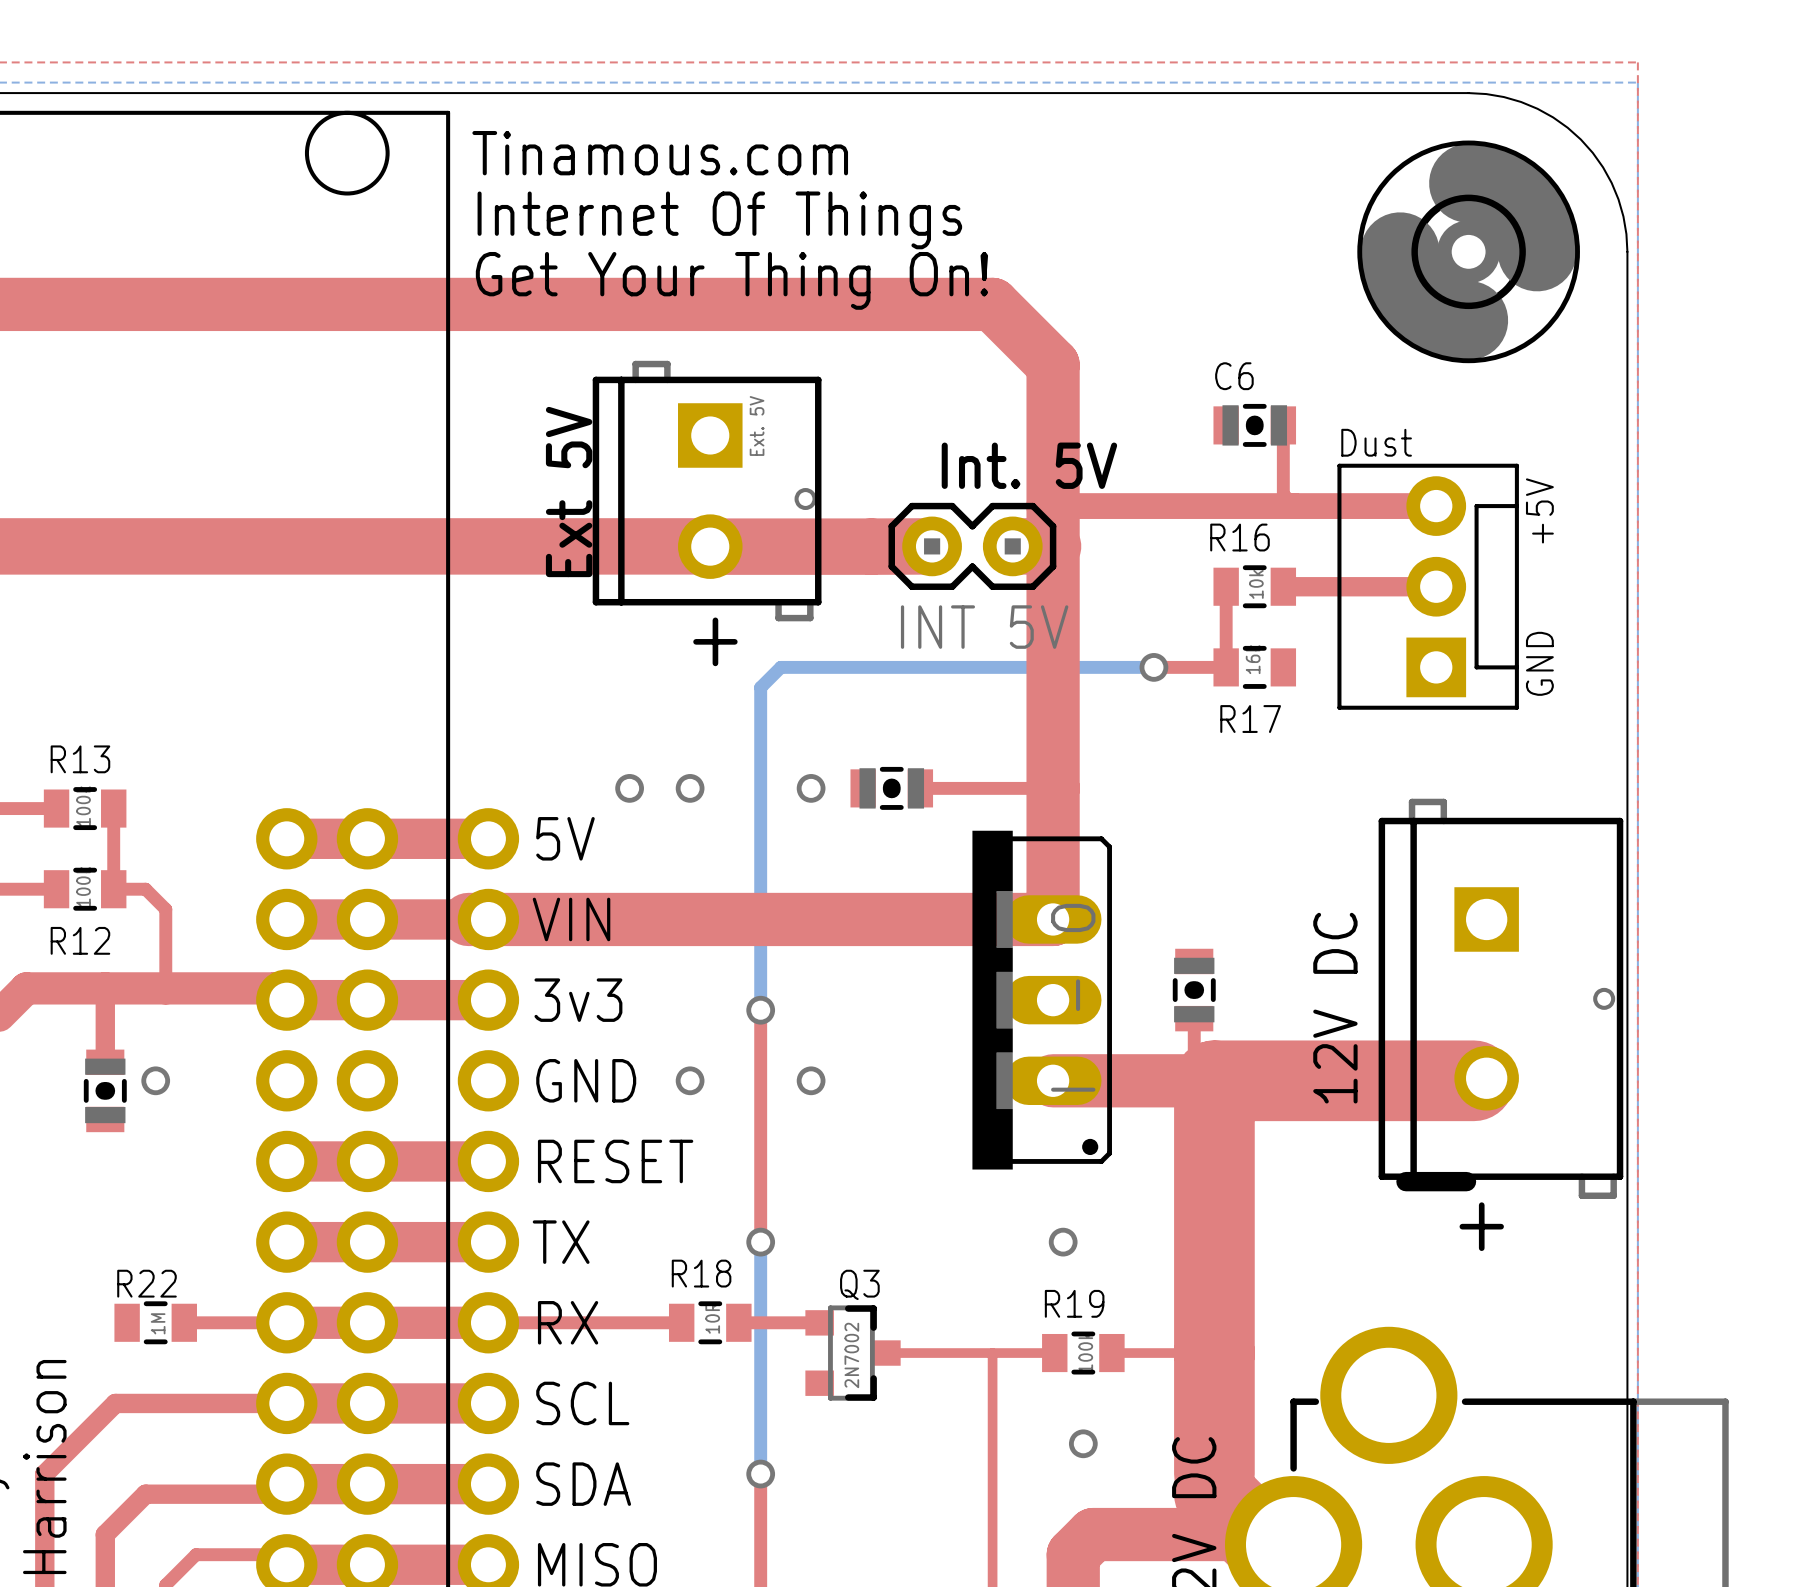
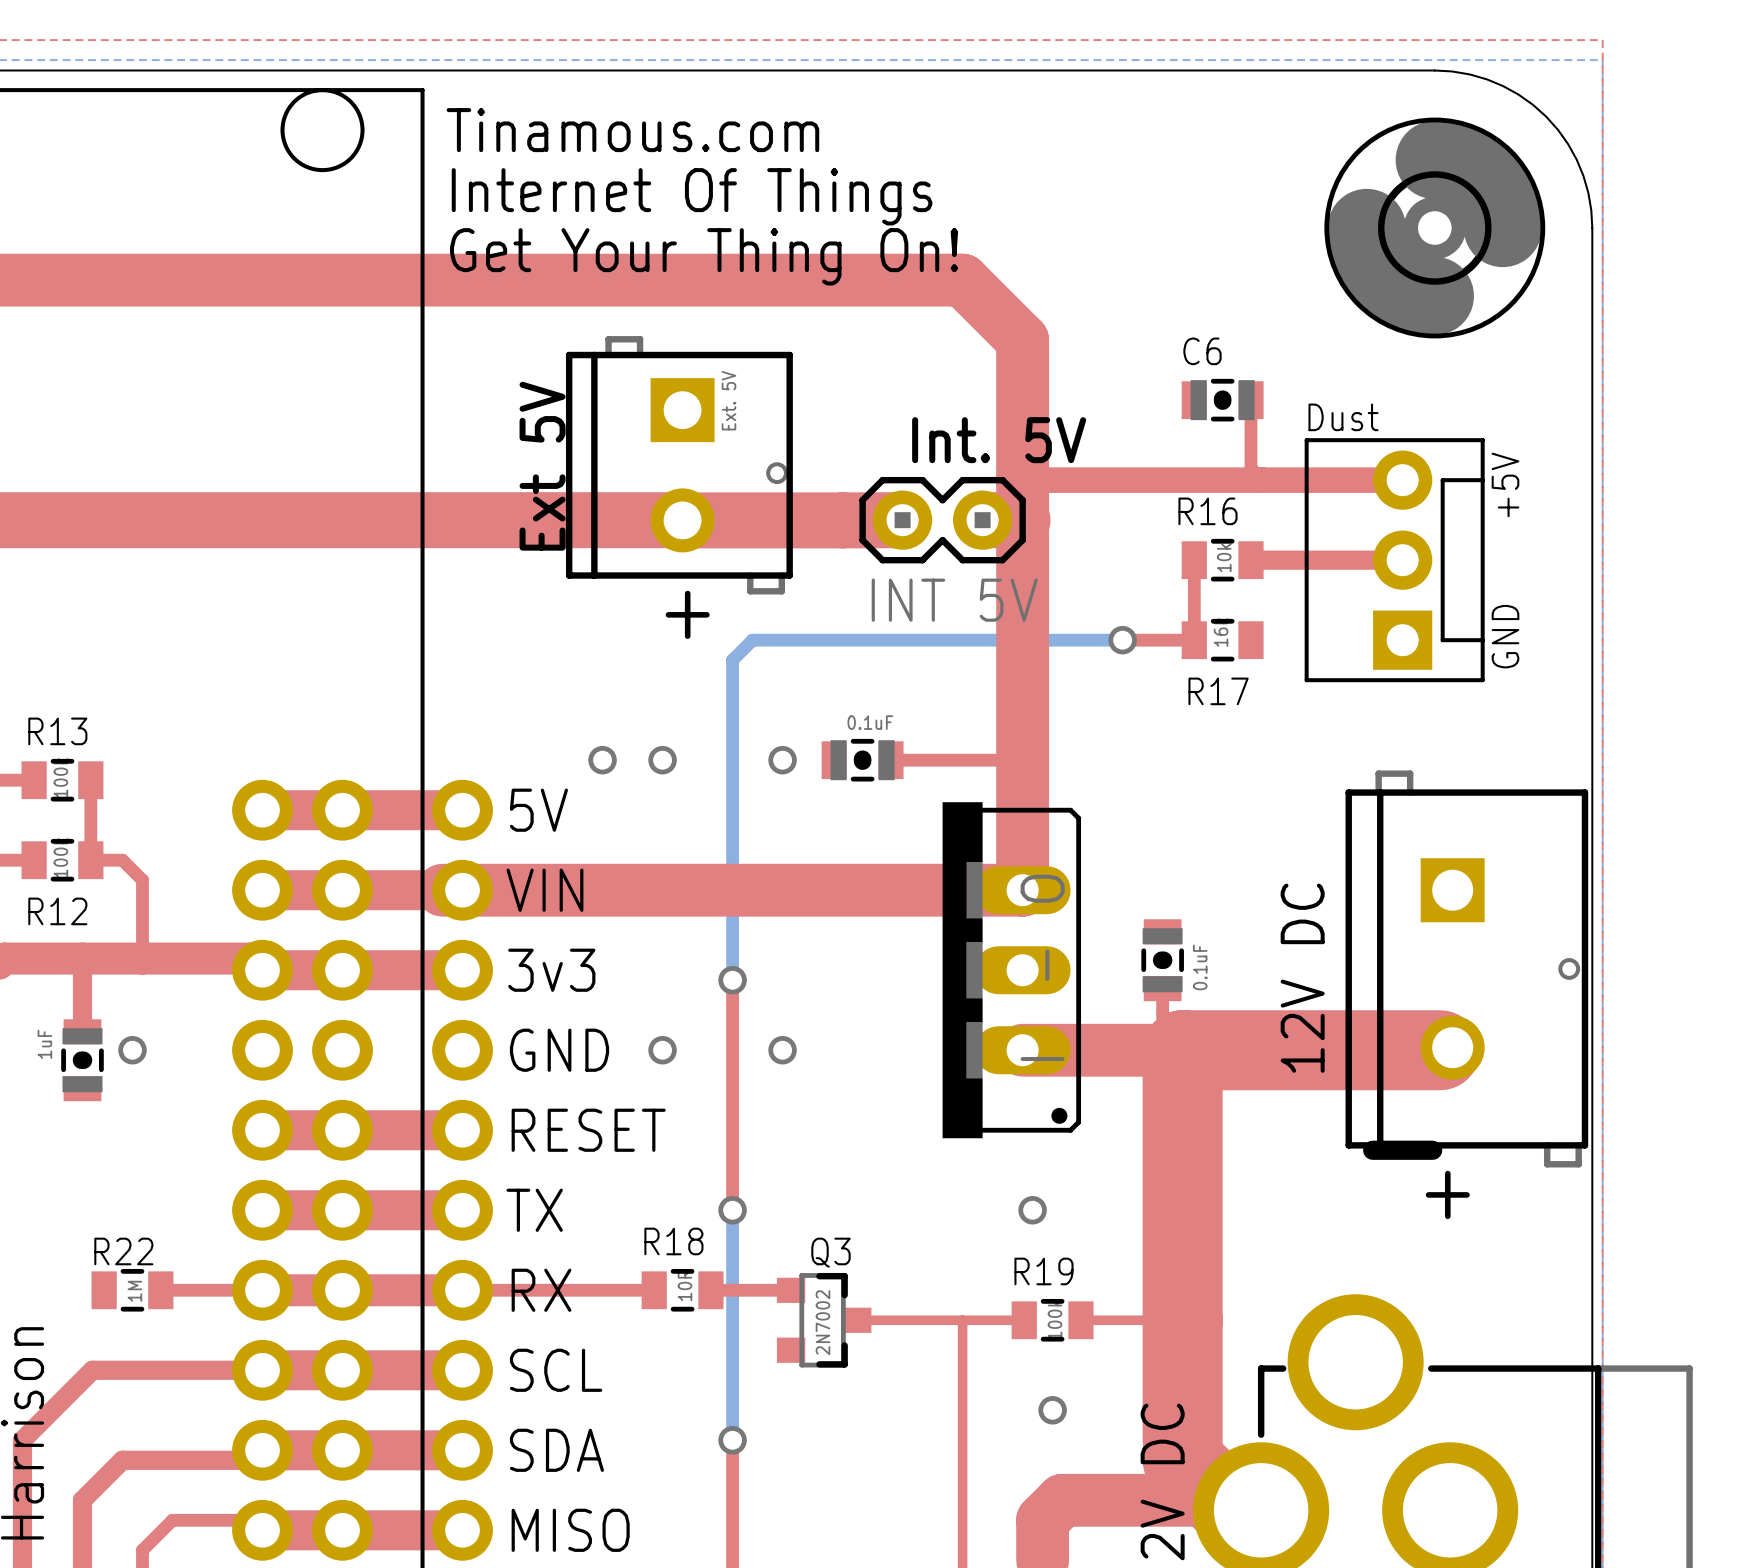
part value: none -> 0.1uF (870, 722)
part value: none -> 0.1uF (1200, 967)
part value: none -> 1uF (44, 1044)

